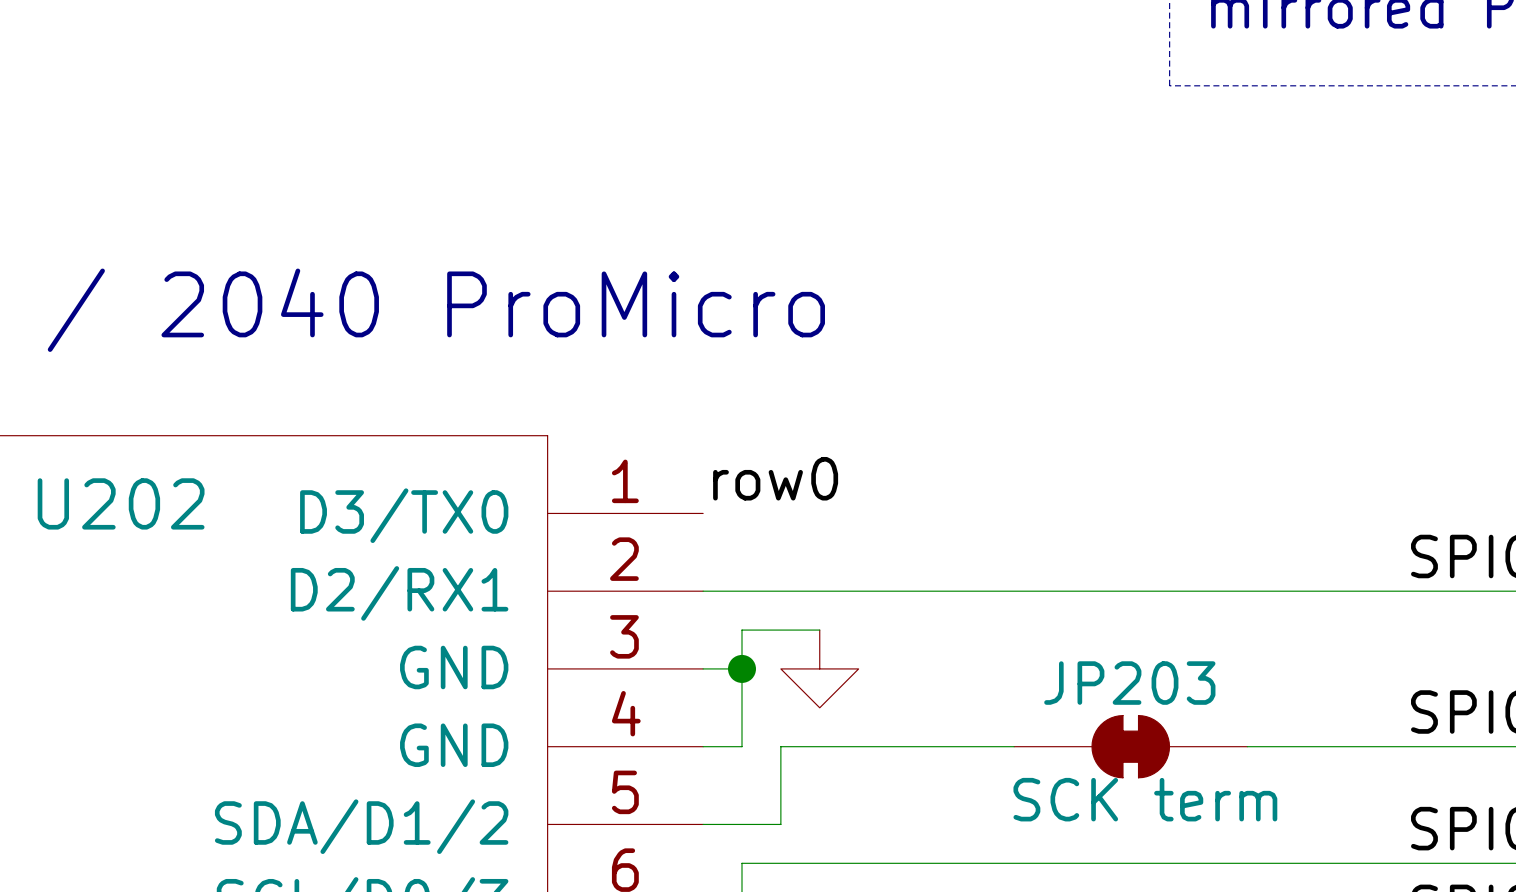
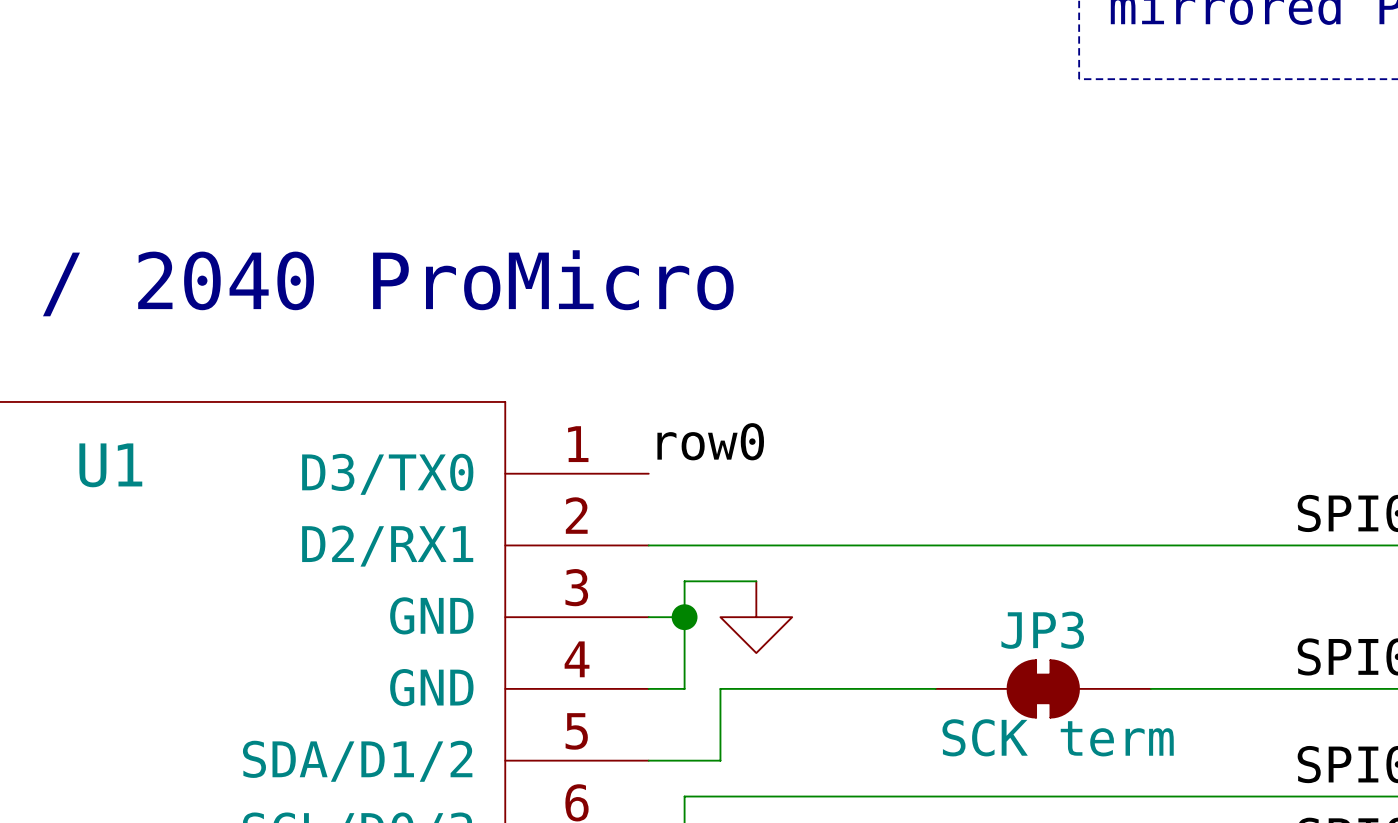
U202 name: U202 (121, 503) -> U1 (110, 465)
JP203 name: JP203 (1129, 683) -> JP3 (1042, 630)

